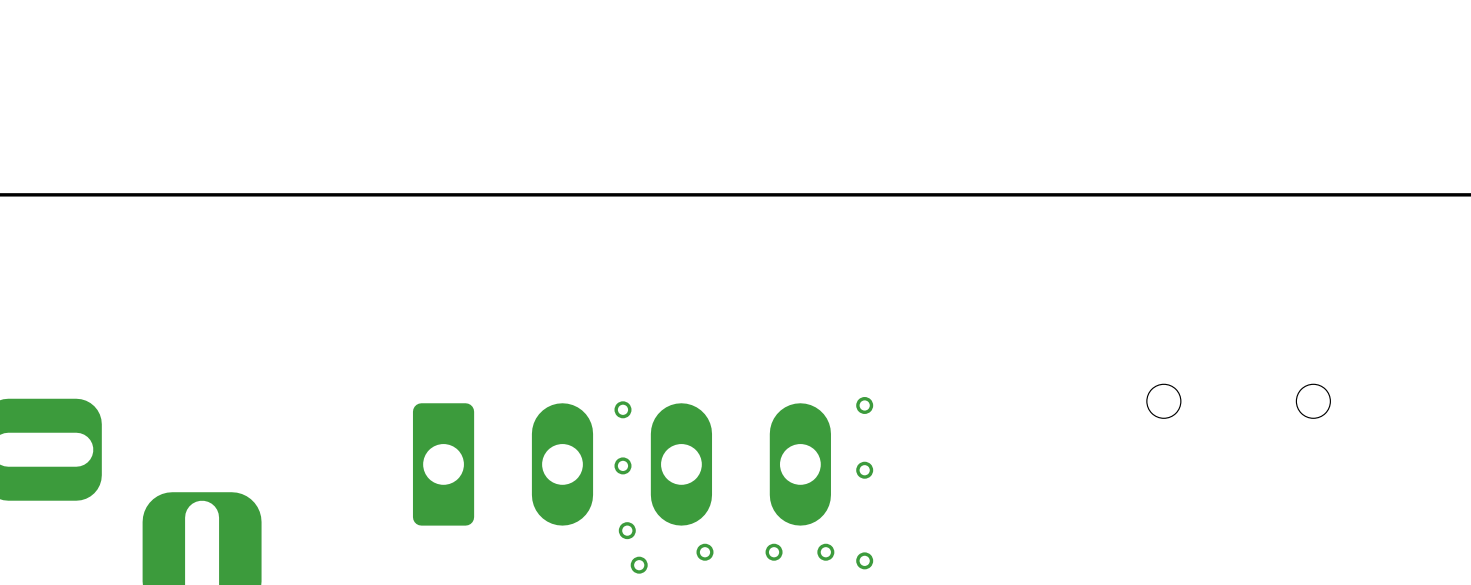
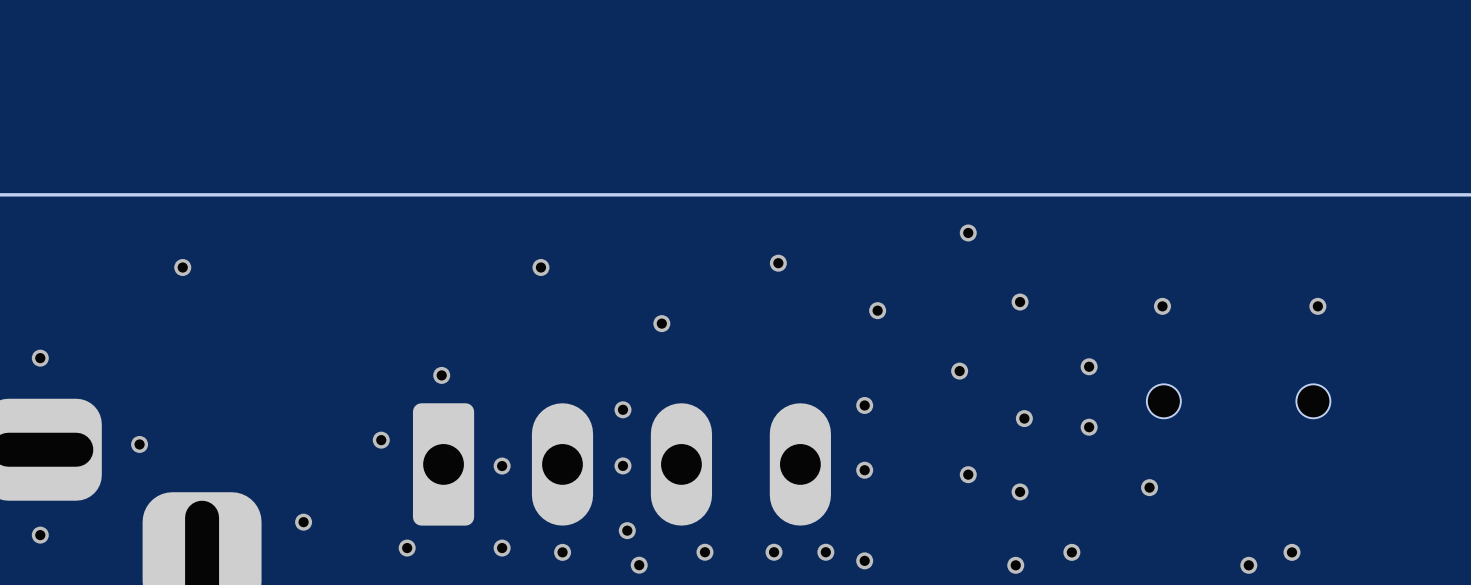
via: none -> (968, 232)
via: none -> (778, 263)
via: none -> (182, 267)
via: none -> (540, 267)
via: none -> (1020, 302)
via: none -> (1162, 306)
via: none -> (1317, 306)
via: none -> (877, 310)
via: none -> (661, 323)
via: none -> (40, 358)
via: none -> (1089, 366)
via: none -> (959, 371)
via: none -> (441, 375)
via: none -> (1024, 418)
via: none -> (1089, 427)
via: none -> (381, 440)
via: none -> (139, 444)
via: none -> (502, 466)
via: none -> (968, 474)
via: none -> (1149, 487)
via: none -> (1020, 491)
via: none -> (303, 522)
via: none -> (40, 535)
via: none -> (407, 548)
via: none -> (502, 548)
via: none -> (562, 552)
via: none -> (1071, 552)
via: none -> (1291, 552)
via: none -> (1015, 565)
via: none -> (1248, 565)

